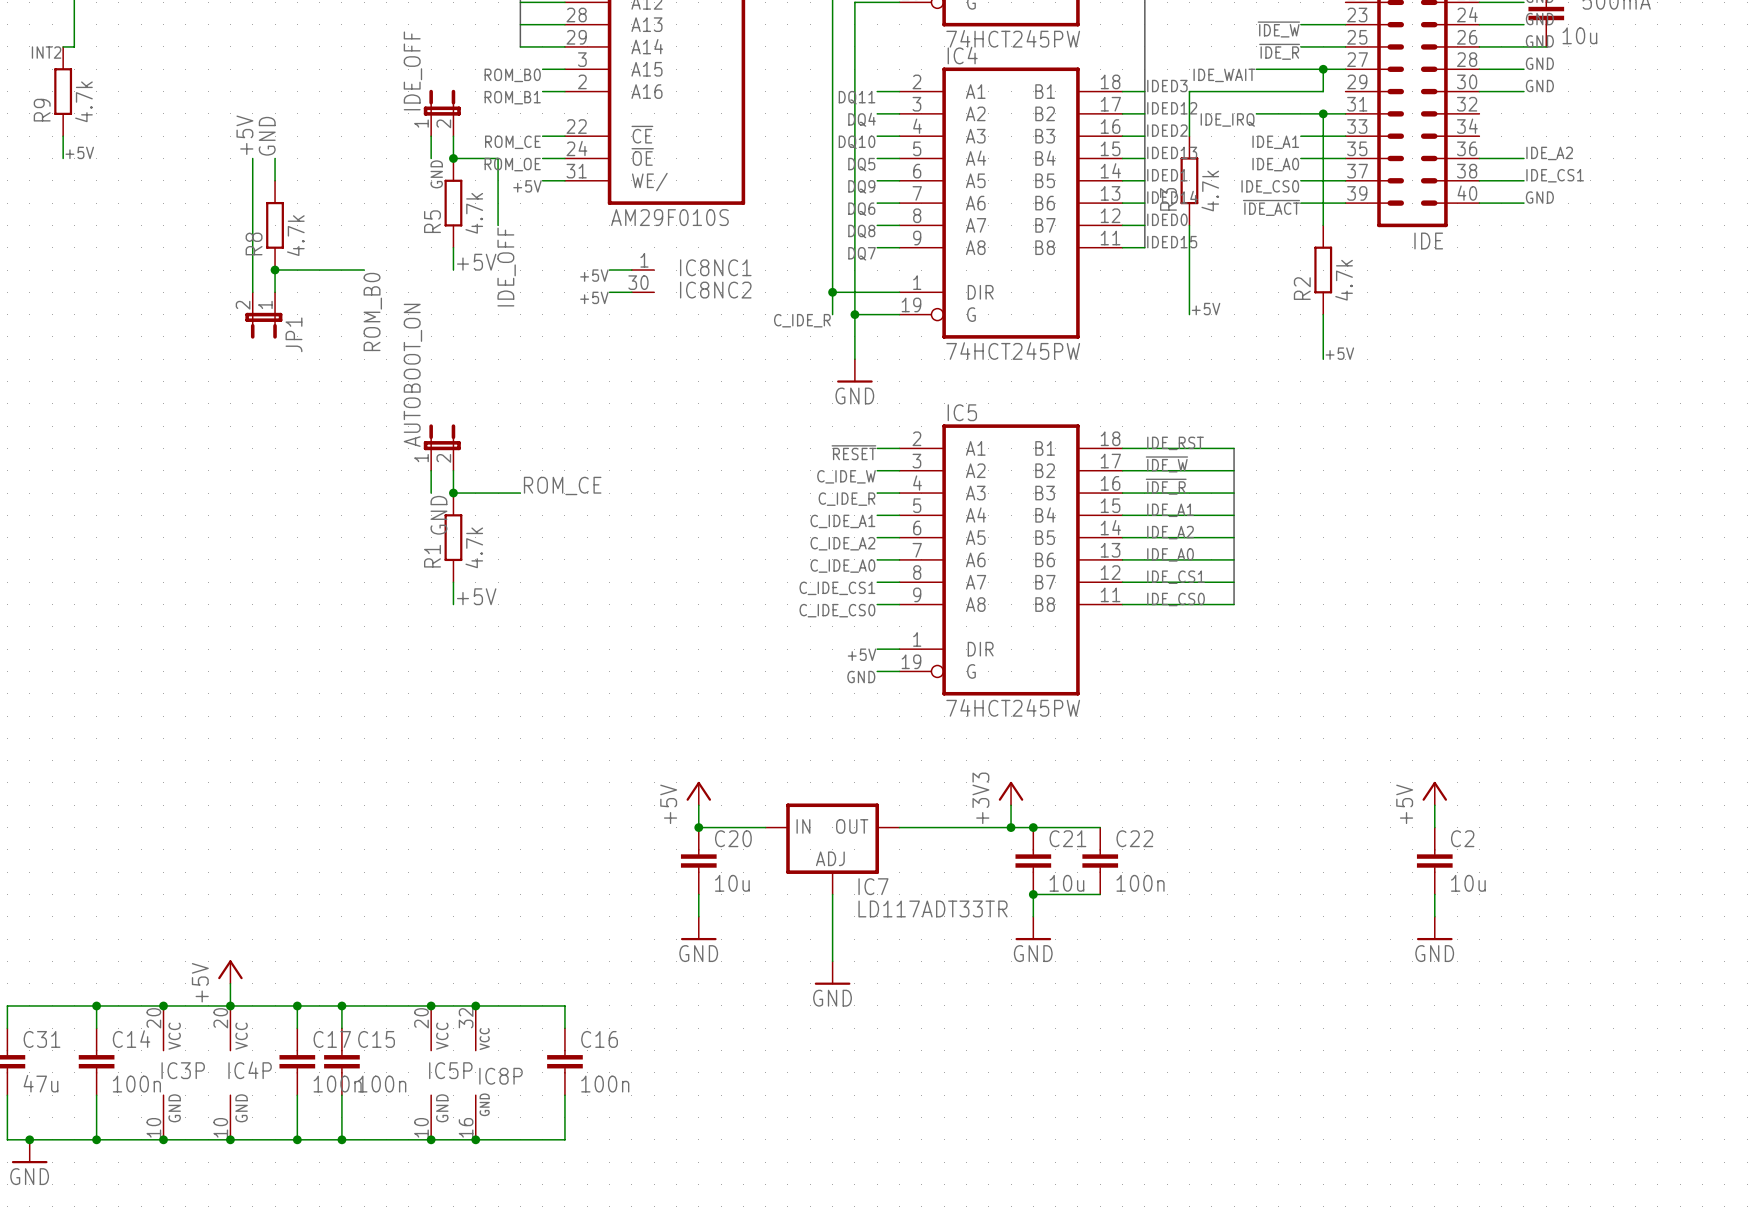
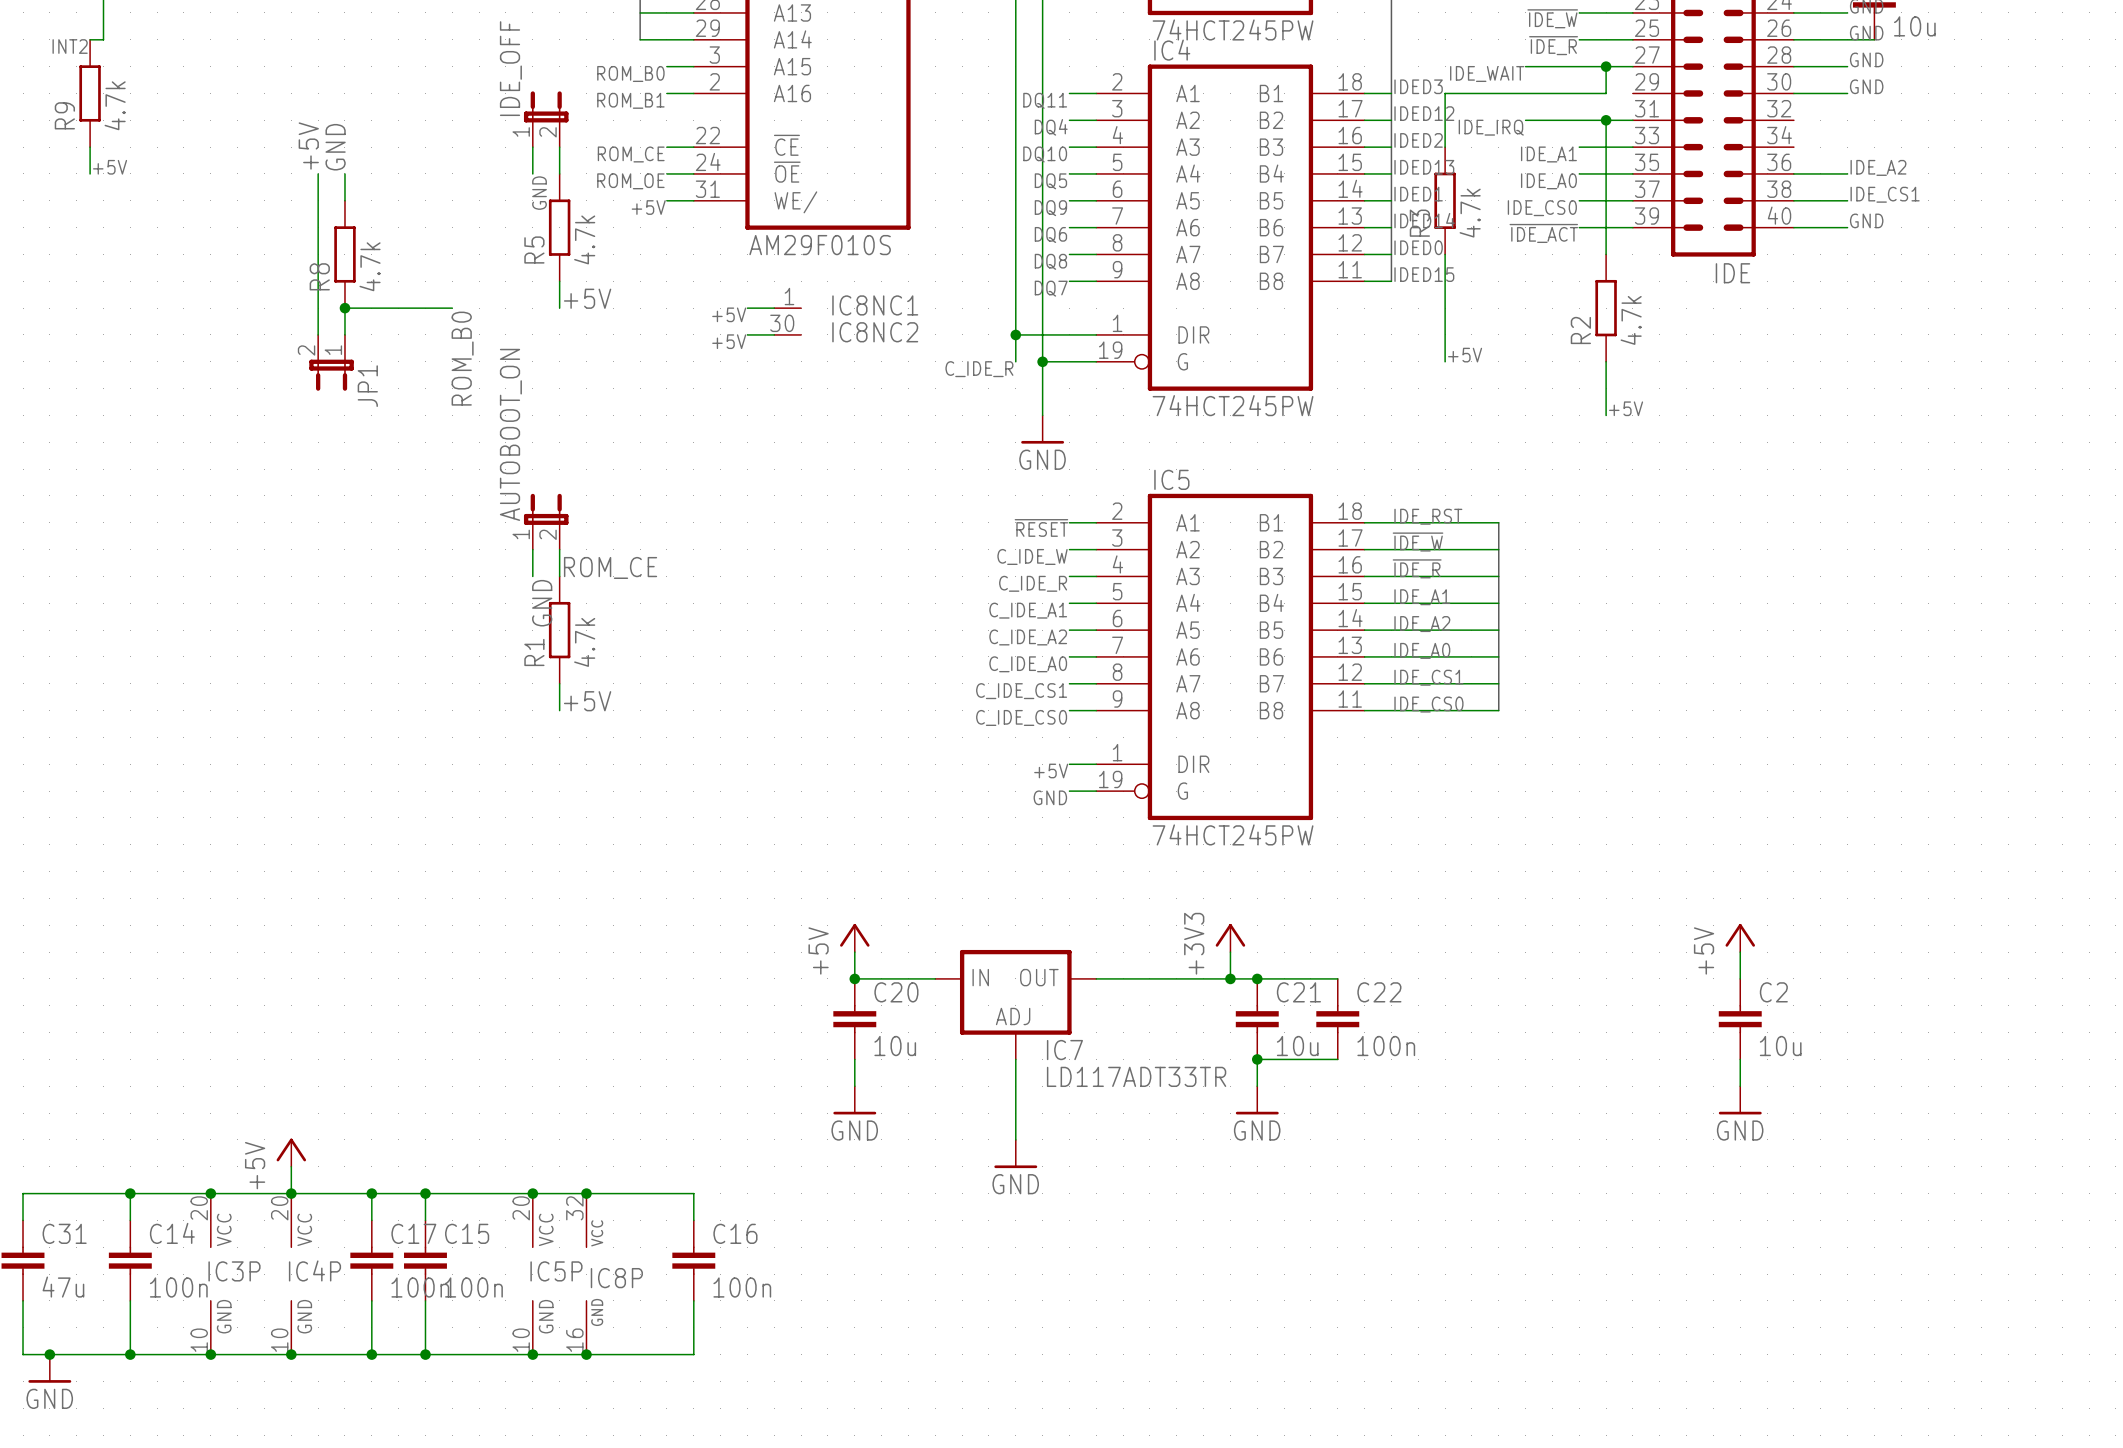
wire: (453, 158) (498, 158) (498, 225) -> none
junction: (453, 158) -> none
label: IDE_OFF (506, 267) -> none
label position: ROM_CE (562, 485) -> ROM_CE (610, 567)
wire: (453, 493) (520, 493) -> none
junction: (453, 493) -> none

